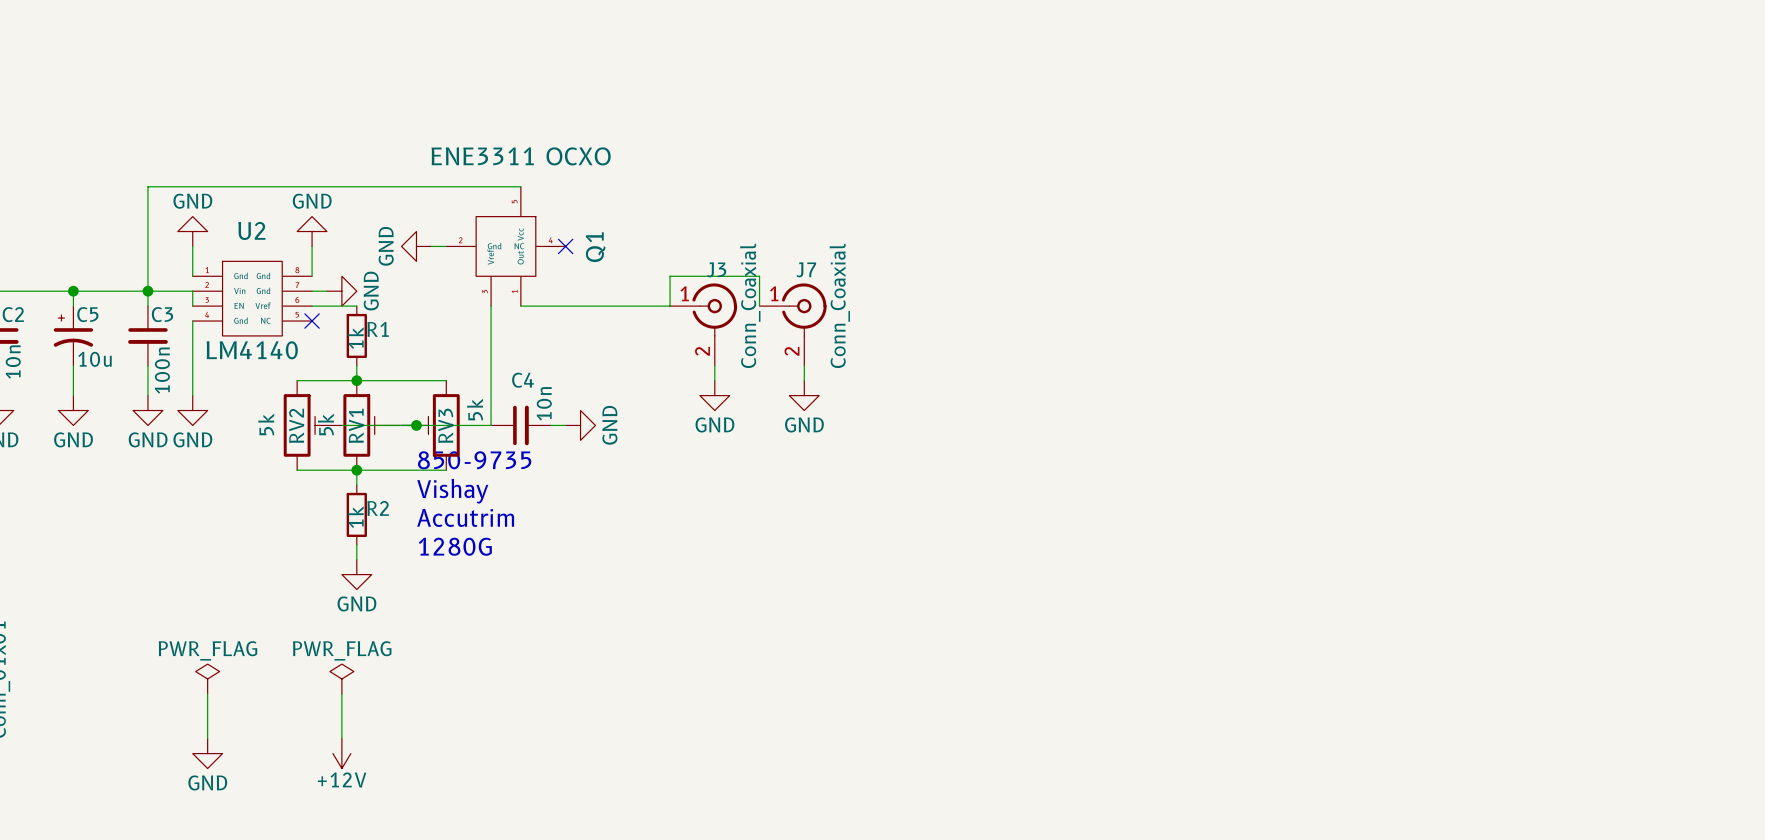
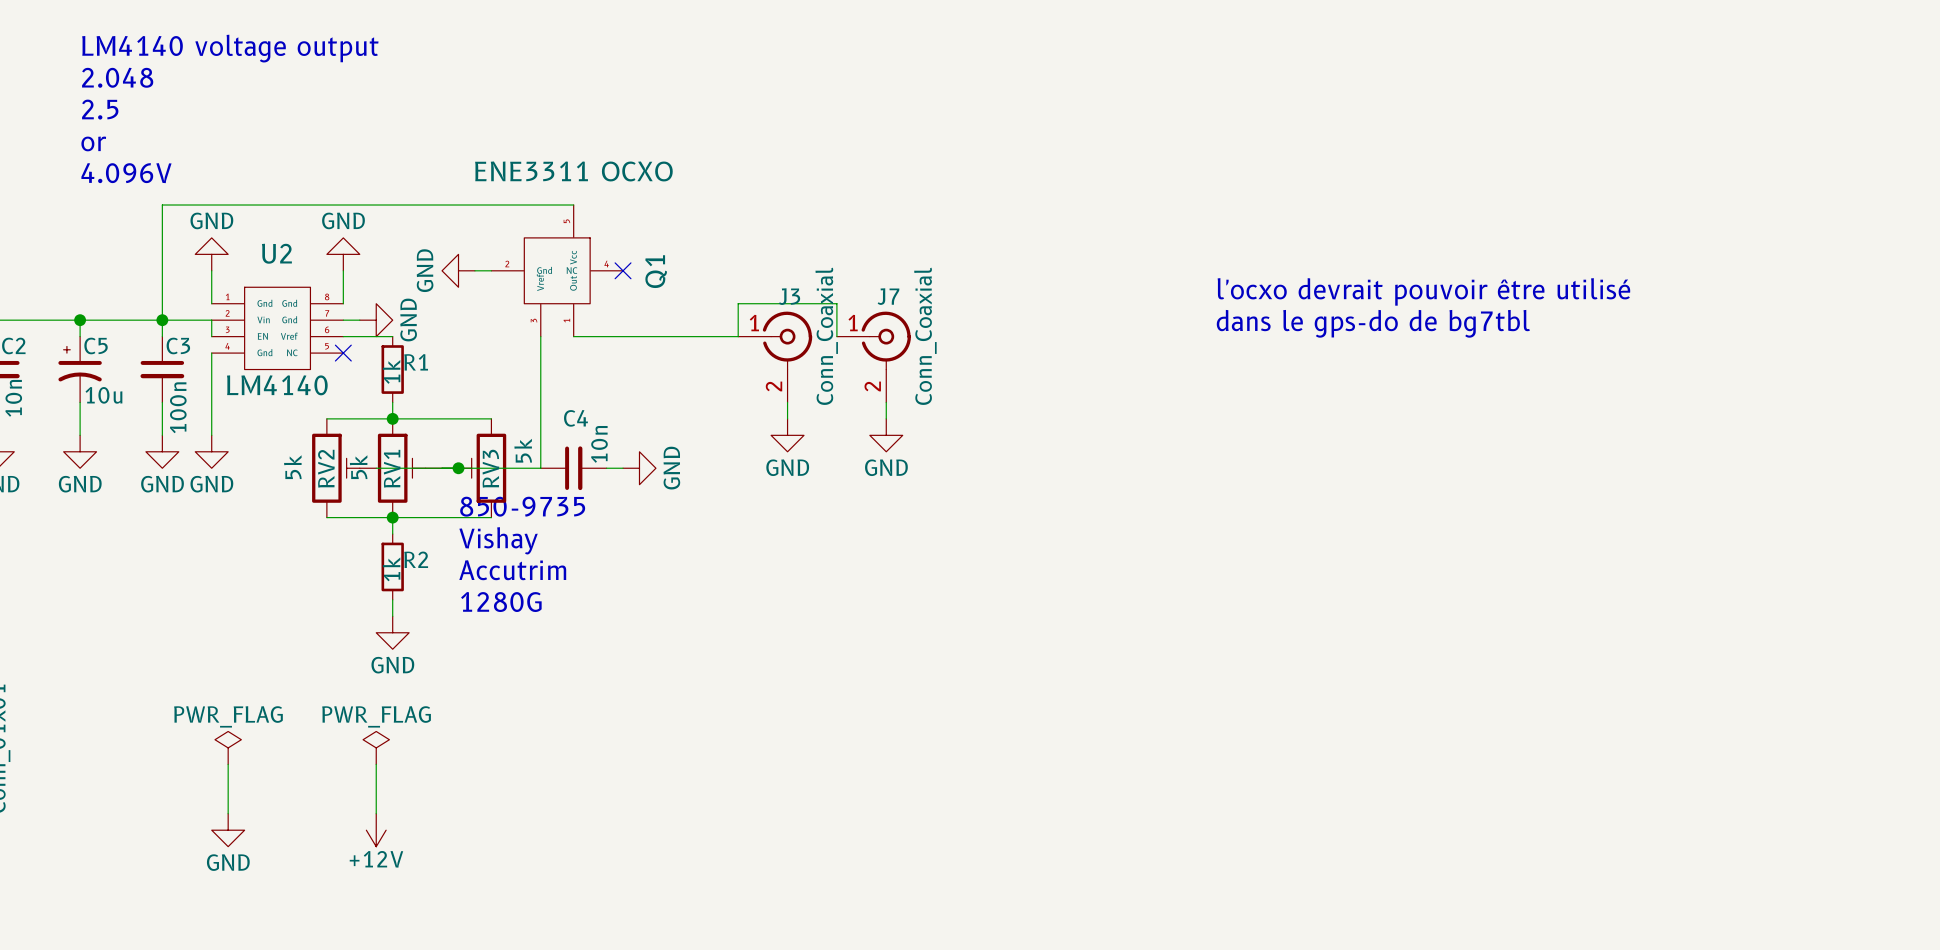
text: none -> LM4140 voltage output (230, 48)
text: none -> 2.048 (117, 77)
text: none -> 2.5 (100, 109)
text: none -> or (93, 143)
text: none -> 4.096V (126, 173)
text: none -> l'ocxo devrait pouvoir être utilisé (1423, 291)
text: none -> dans le gps-do de bg7tbl (1373, 323)

